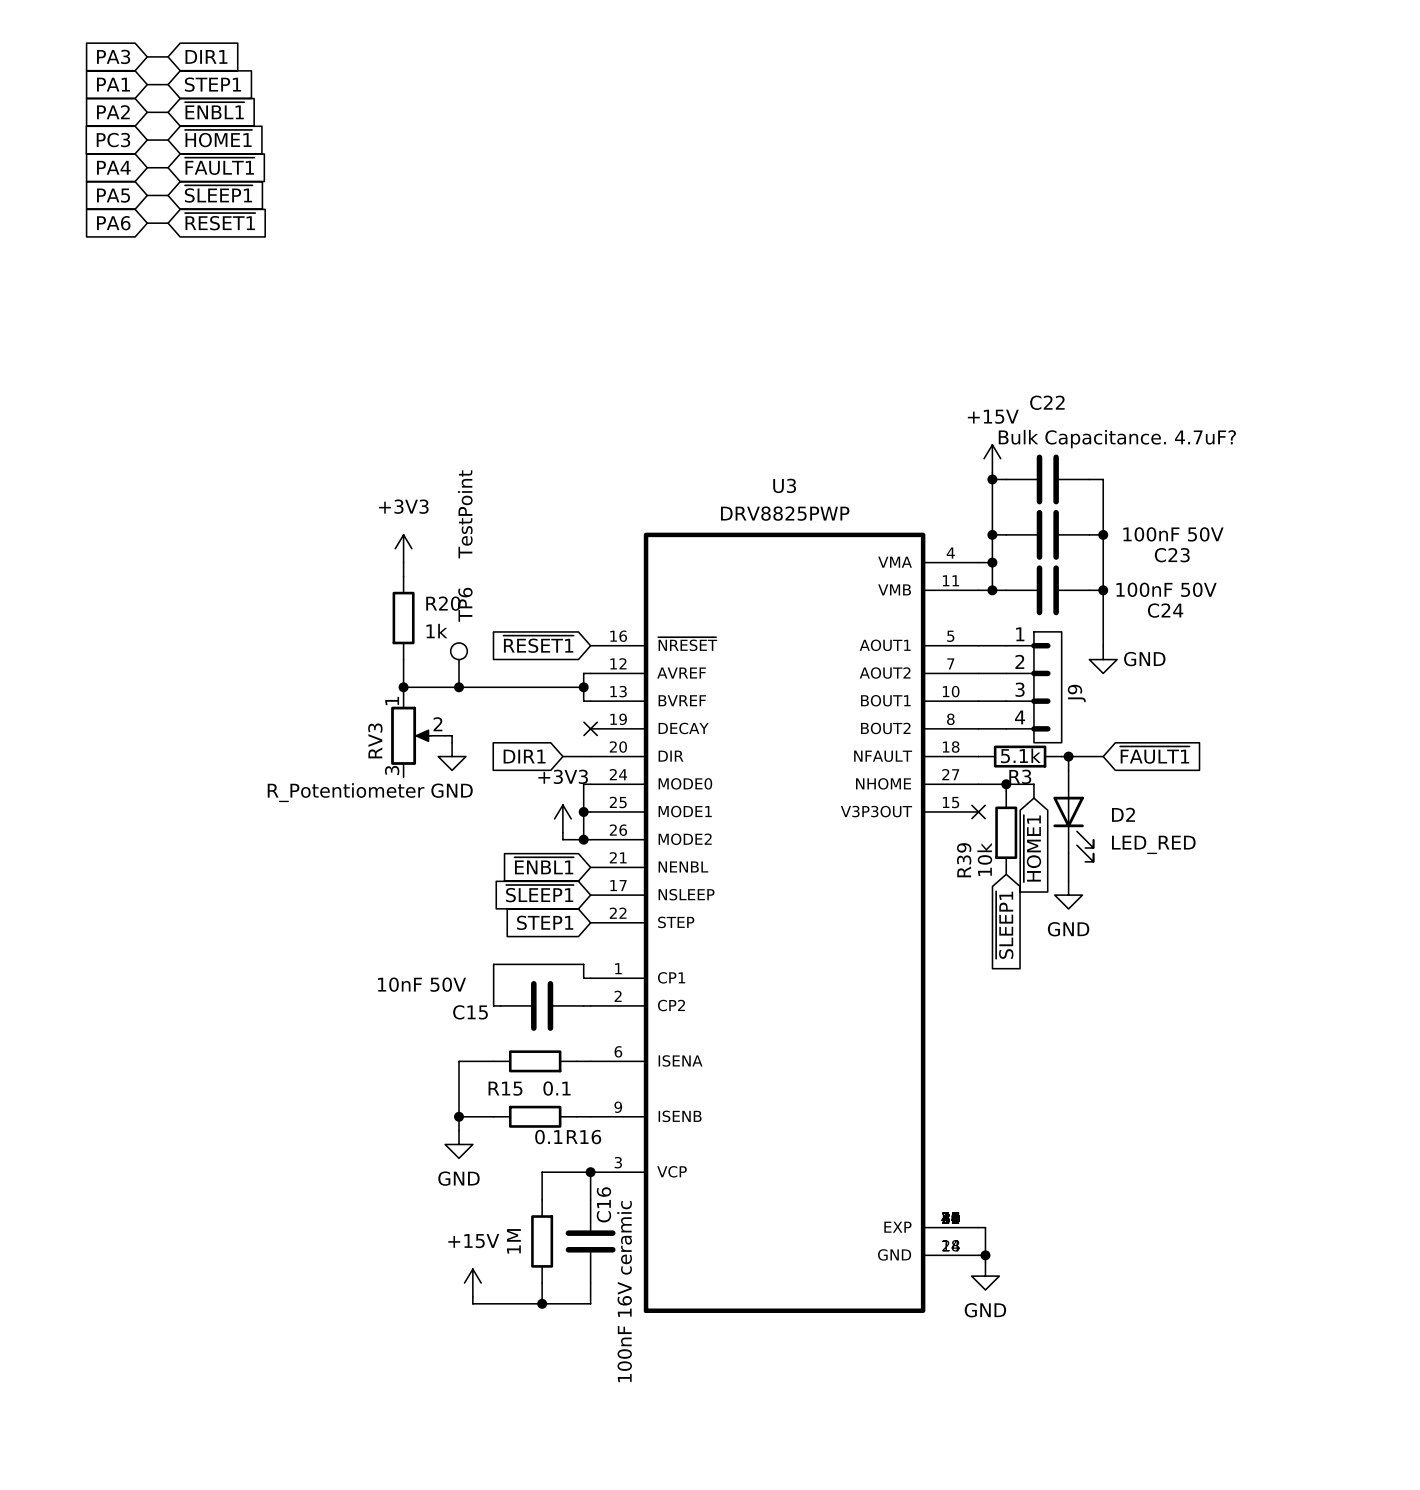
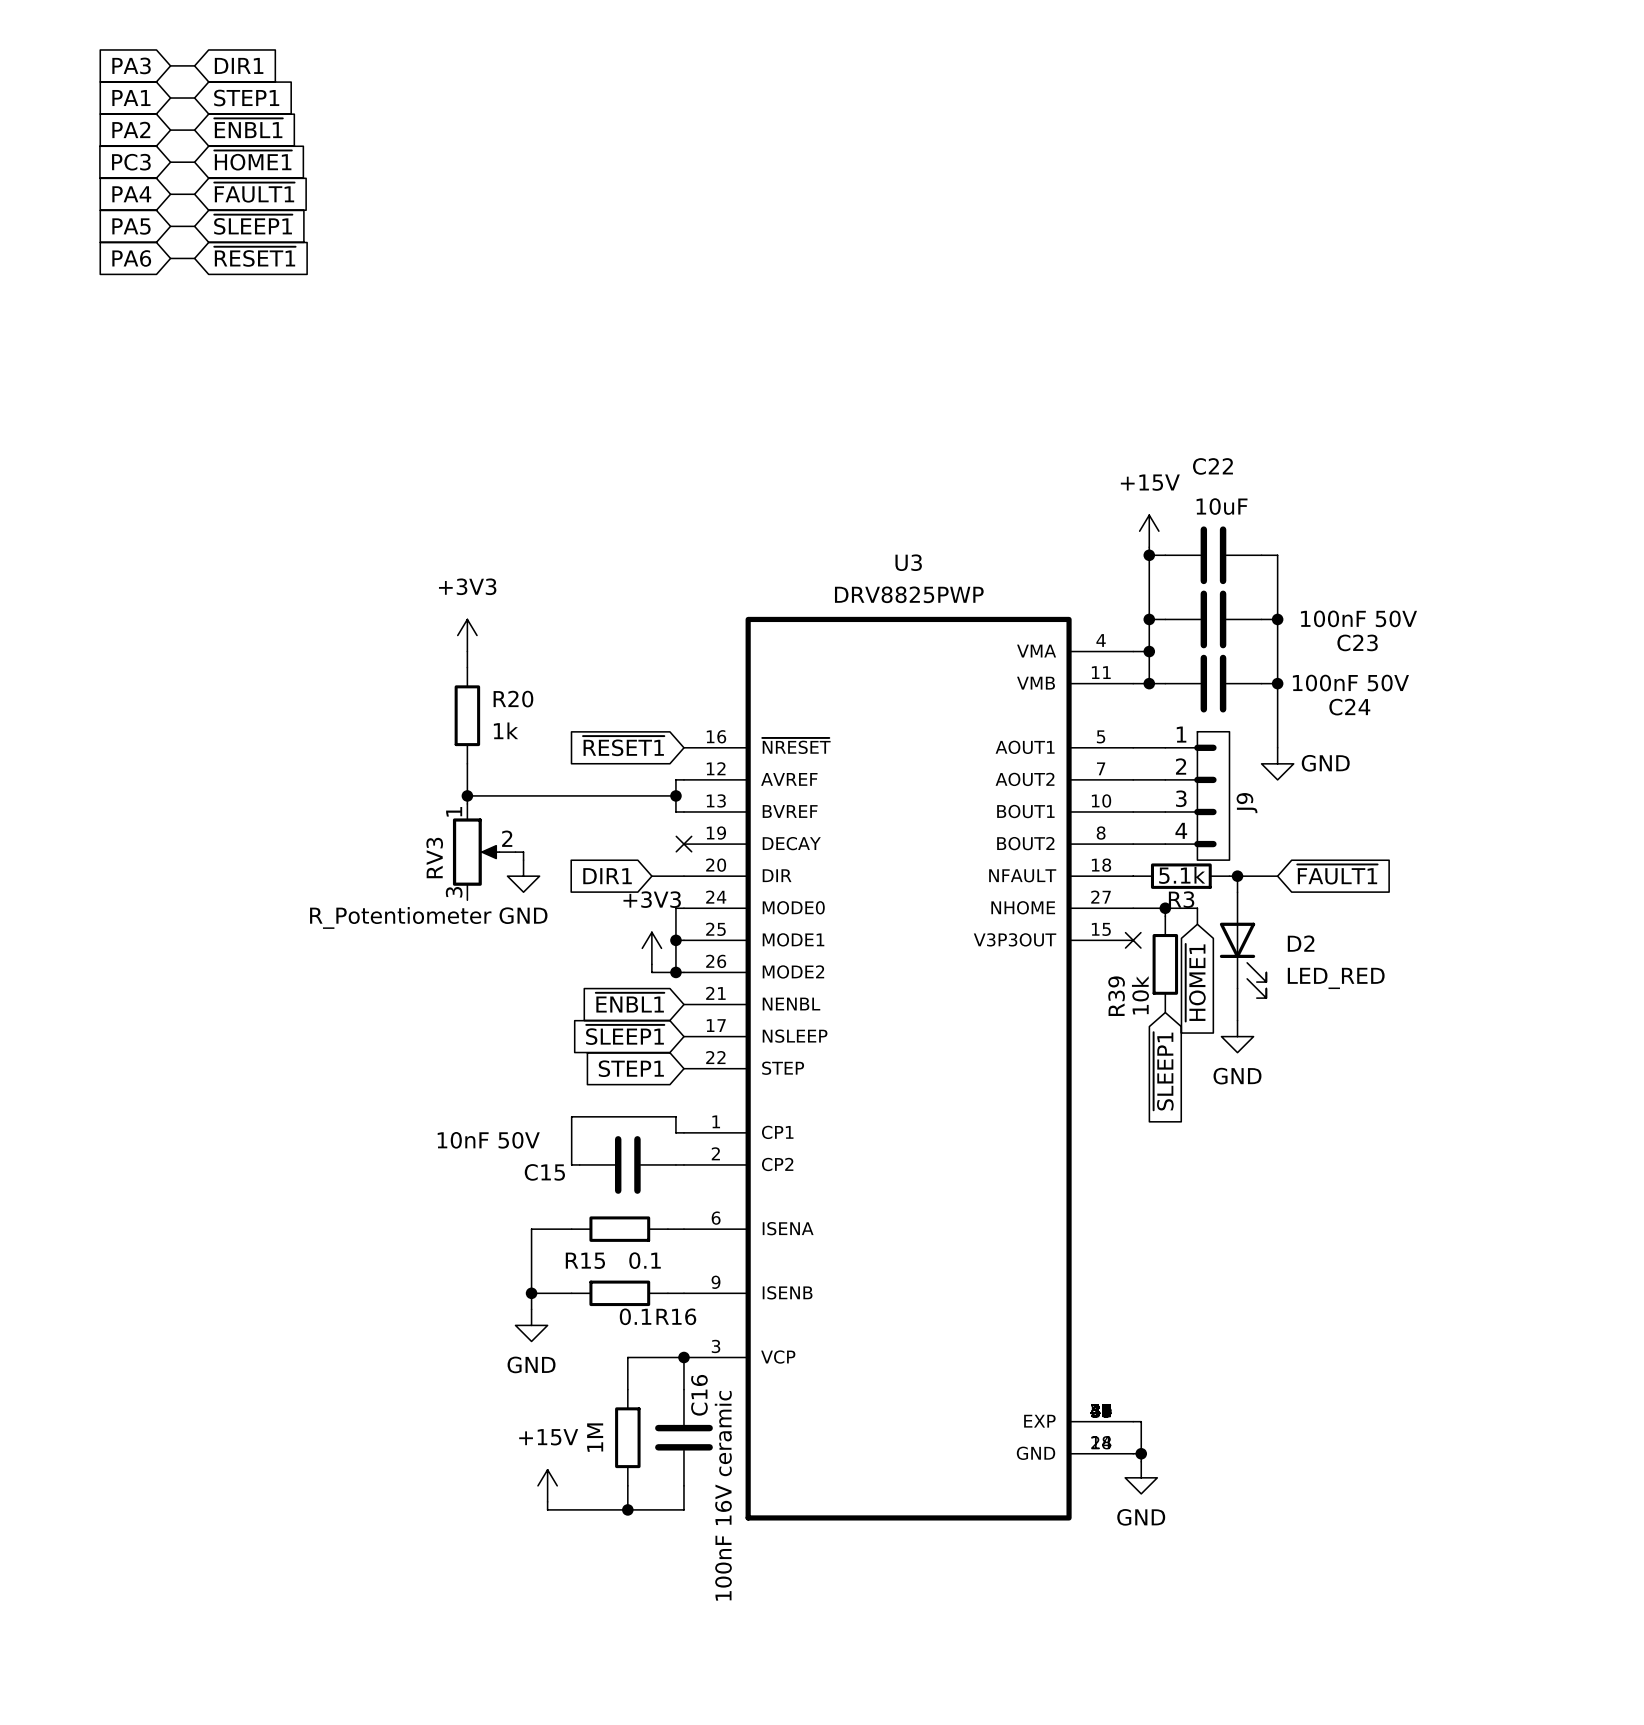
C22 value: Bulk Capacitance. 4.7uF? (1117, 439) -> 10uF (1222, 506)
TP6: TestPoint (459, 665) -> none
junction: (459, 687) -> none

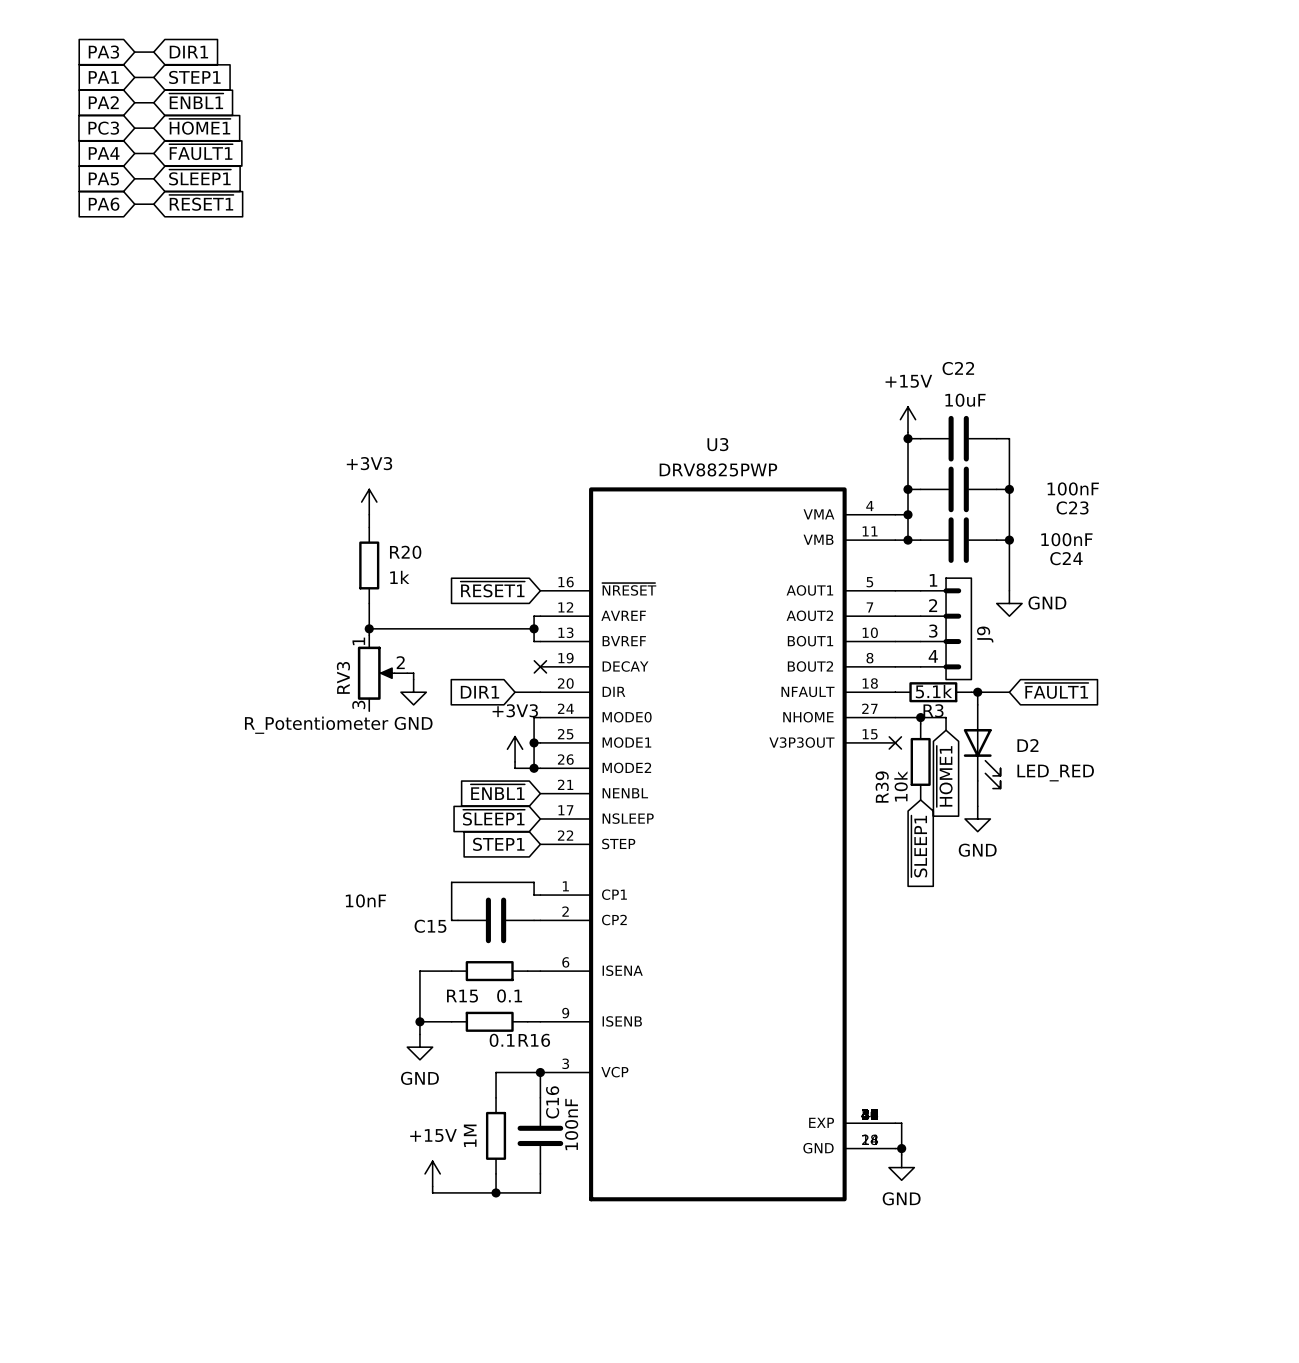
C23 value: 100nF 50V (1358, 618) -> 100nF (1073, 488)
C24 value: 100nF 50V (1350, 683) -> 100nF (1066, 539)
C15 value: 10nF 50V (488, 1140) -> 10nF (365, 900)
C16 value: 100nF 16V ceramic (723, 1495) -> 100nF (571, 1124)

